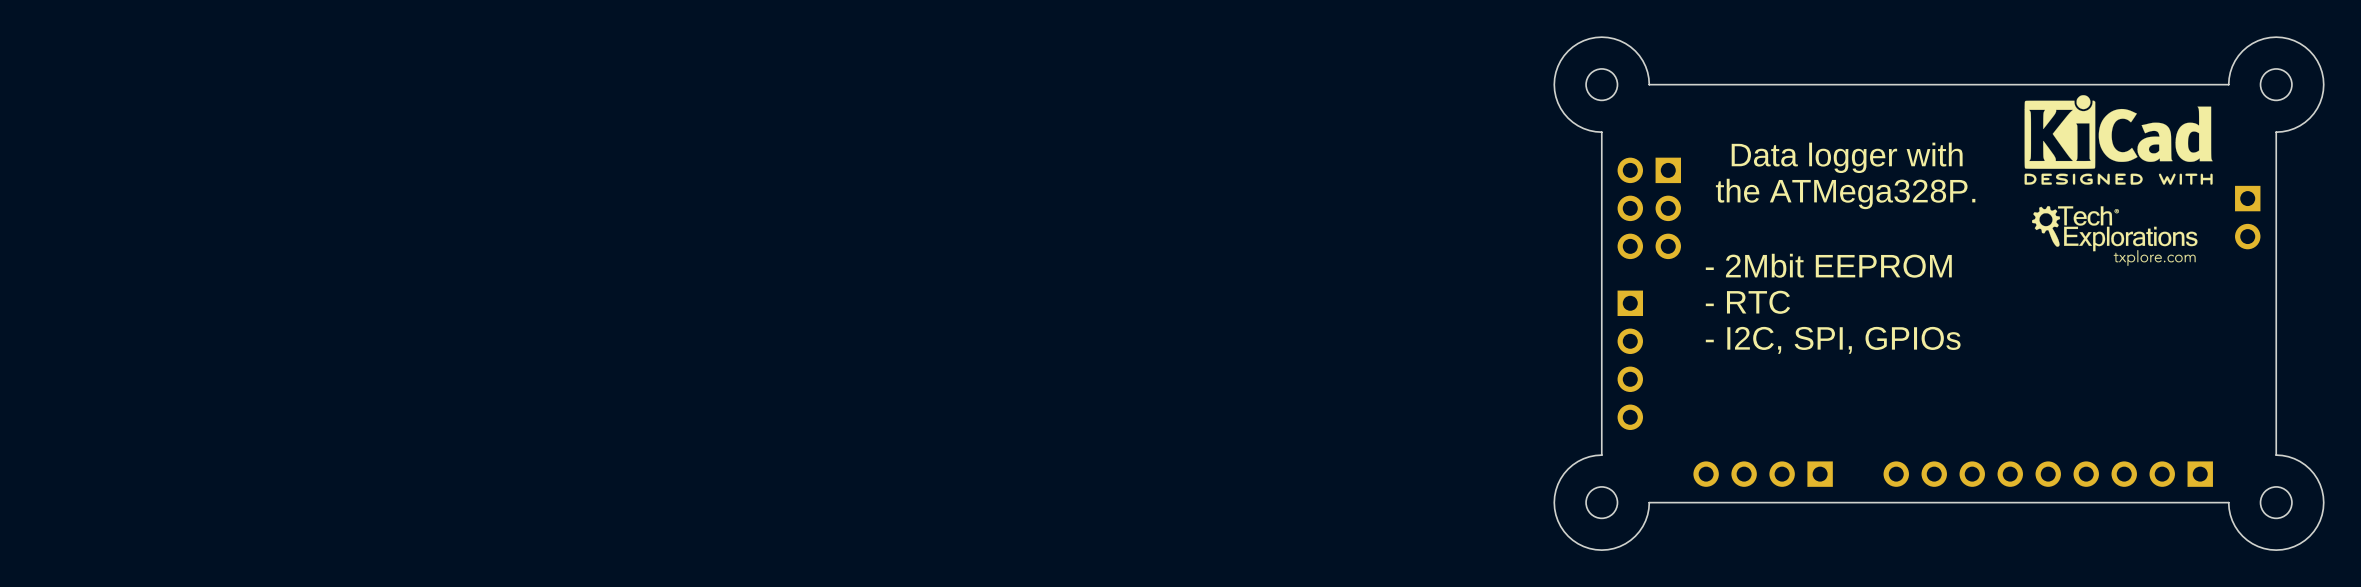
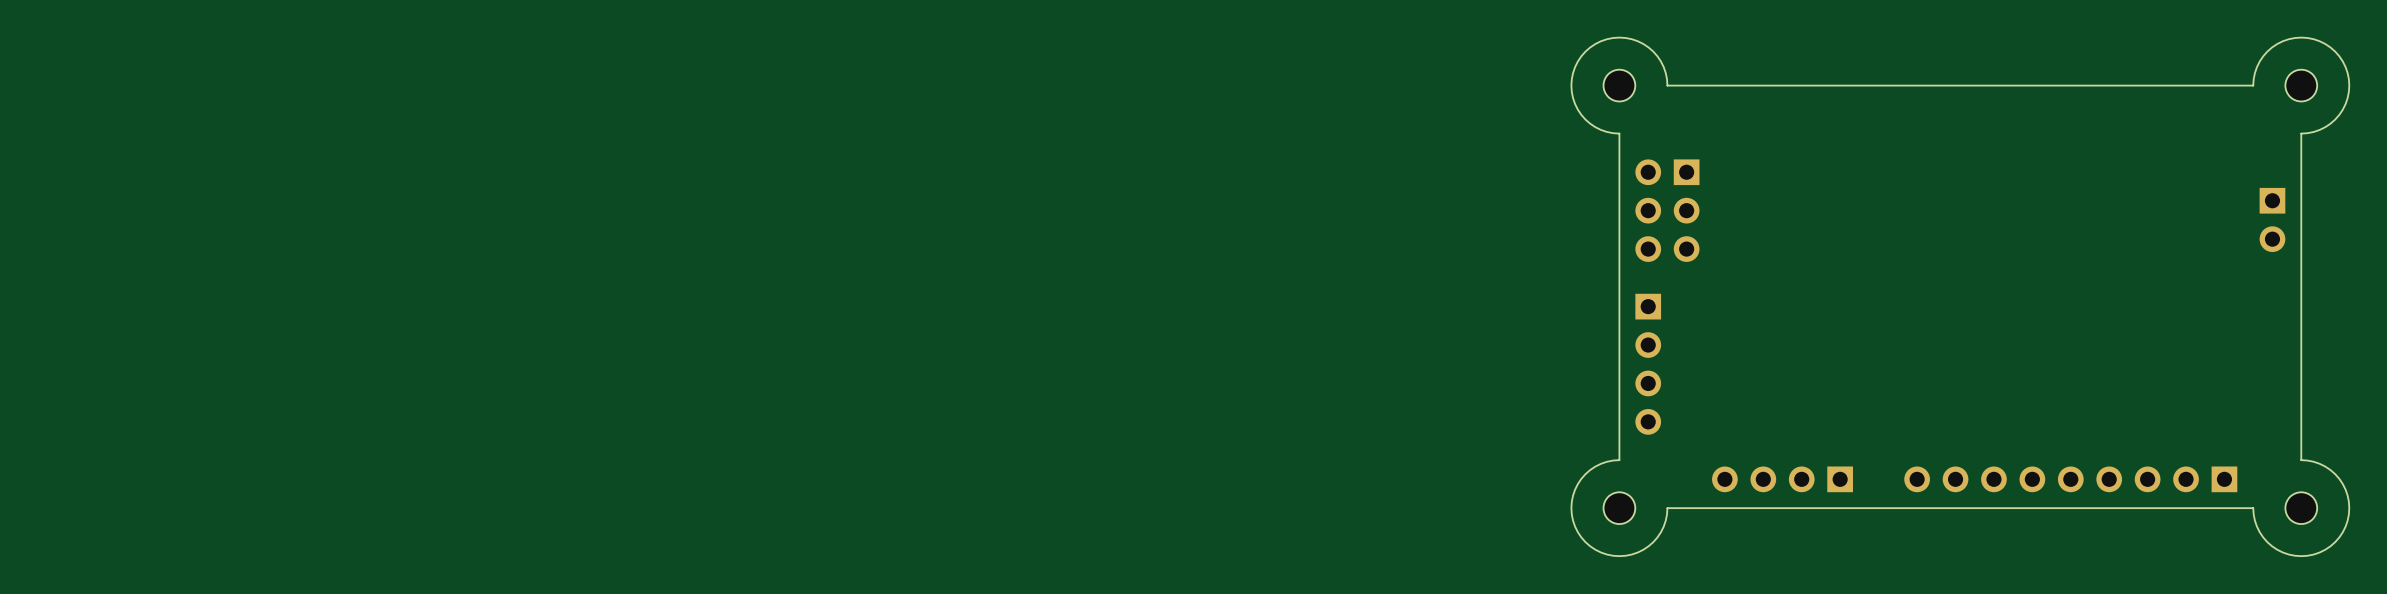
drawing: [2024, 95, 2213, 185] -> none
text: Data logger with (1847, 157) -> none
text: the ATMega328P. (1845, 193) -> none
drawing: [2031, 206, 2198, 266] -> none
text: - 2Mbit EEPROM (1828, 265) -> none
text: - RTC (1747, 302) -> none
text: - I2C, SPI, GPIOs (1833, 340) -> none

